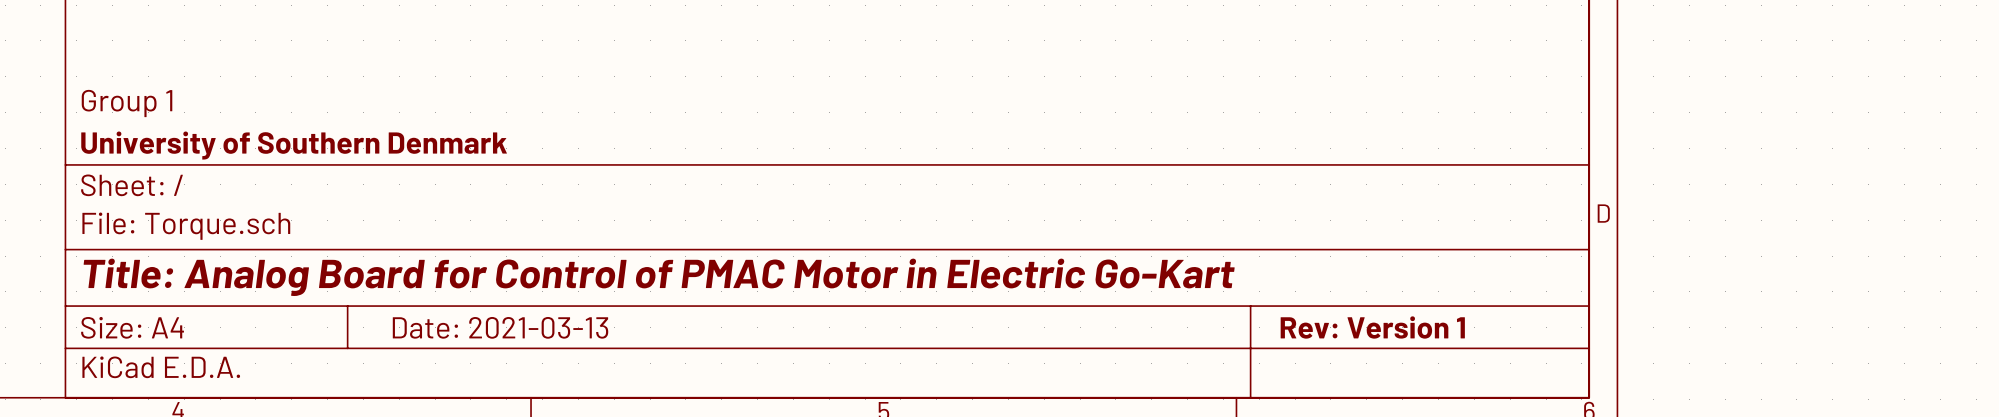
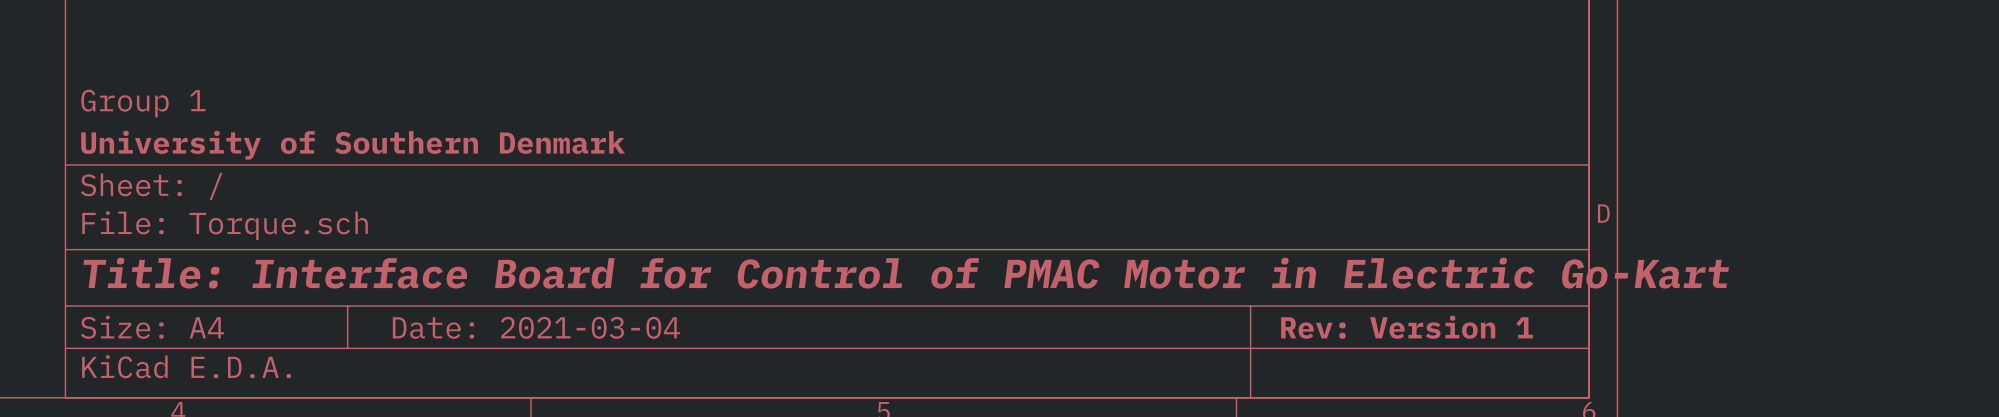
title block: Title: Analog Board for Control of PMAC Motor in Electric Go-Kart (659, 277) -> Title: Interface Board for Control of PMAC Motor in Electric Go-Kart (906, 273)
title block: Date: 2021-03-13 (500, 327) -> Date: 2021-03-04 (536, 327)

